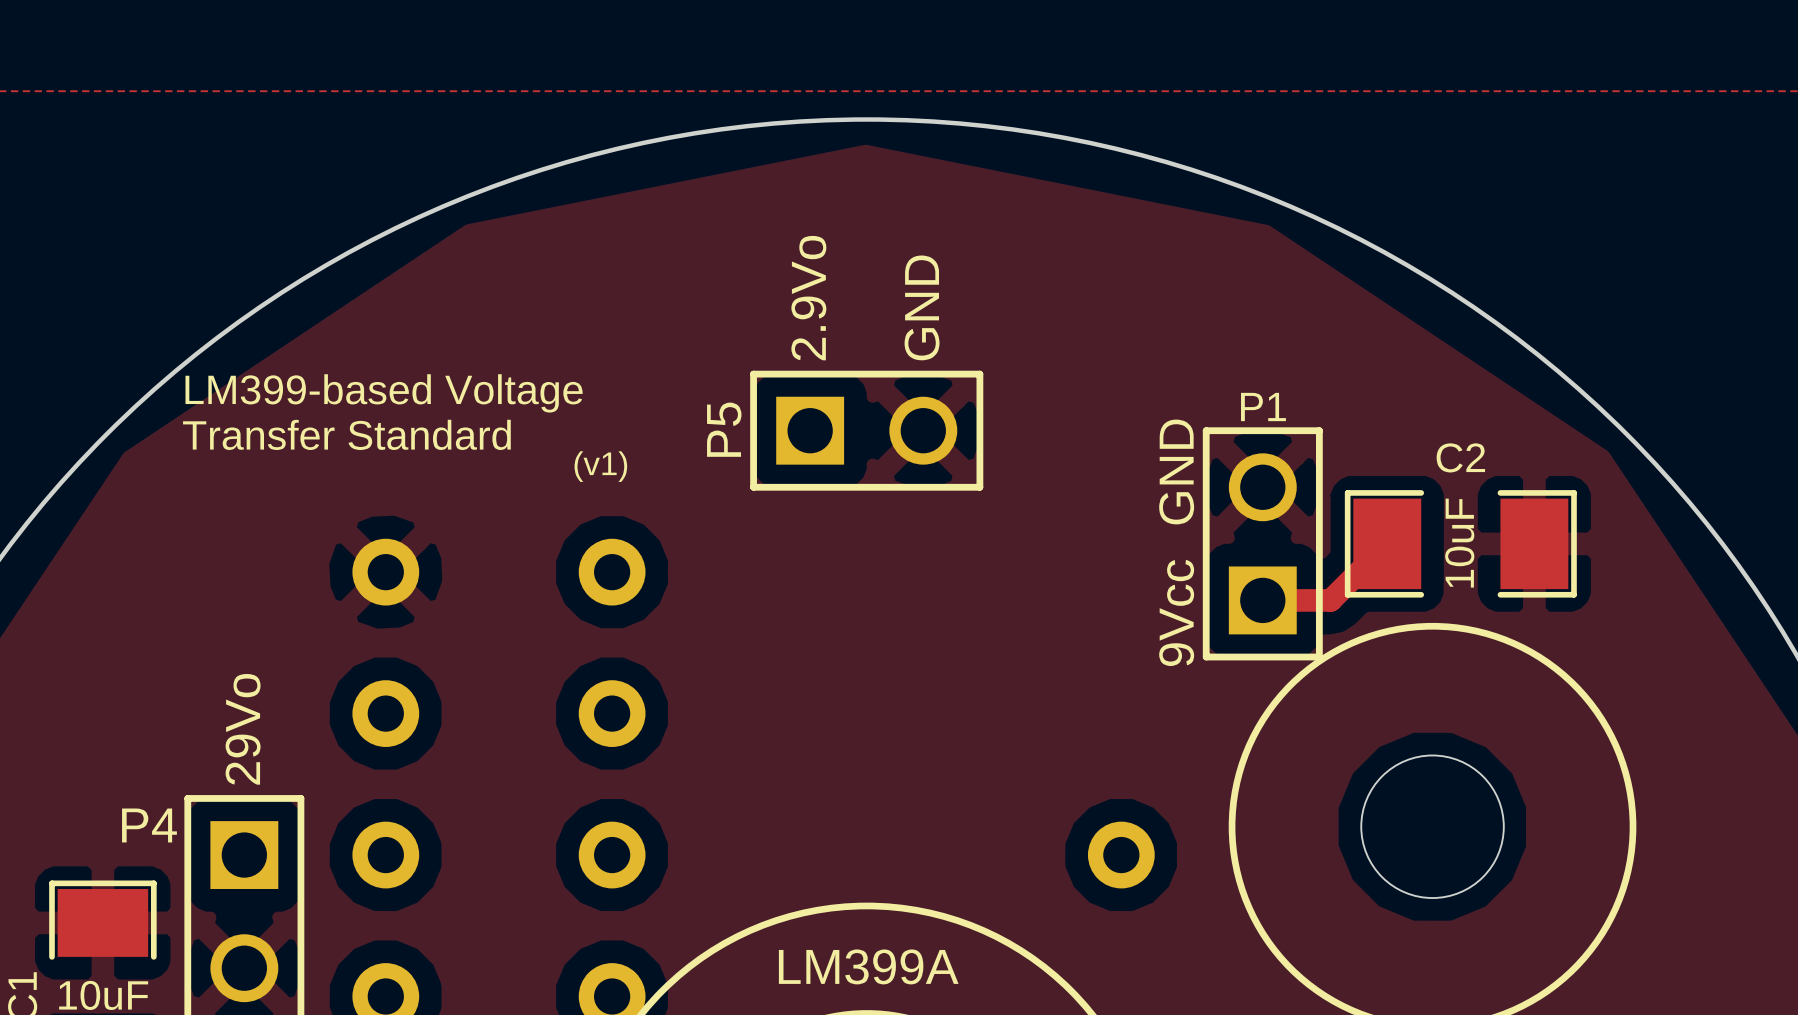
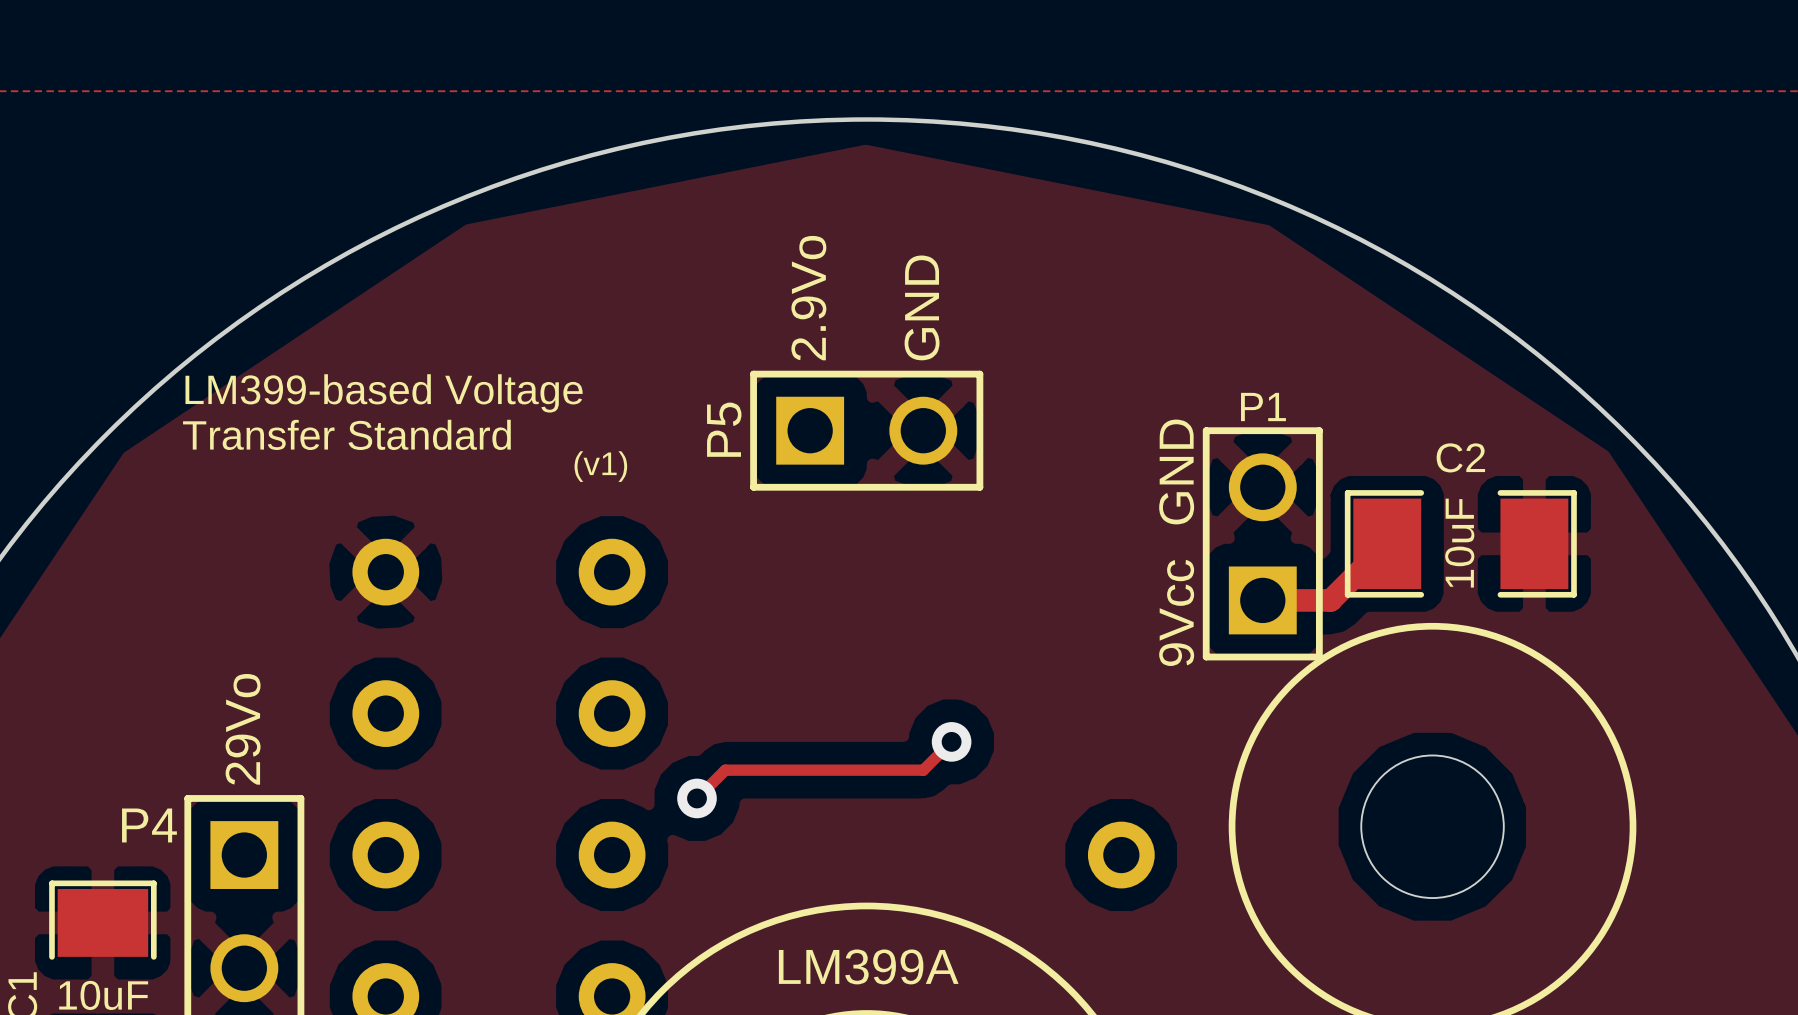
track: none -> (951, 741) (923, 770) (725, 770) (697, 798)
via: none -> (951, 741)
via: none -> (697, 798)

